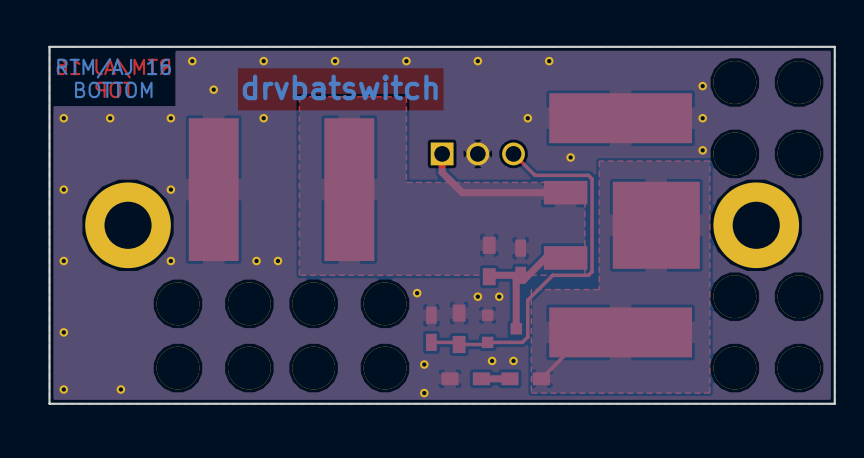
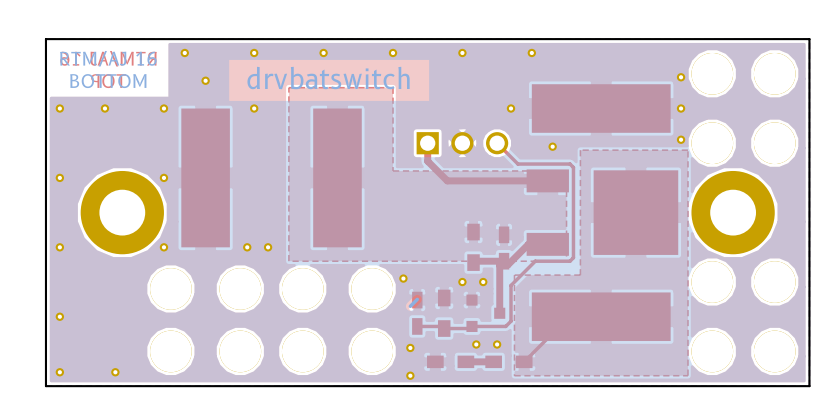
bottom track: none -> (417, 299) (410, 306)

